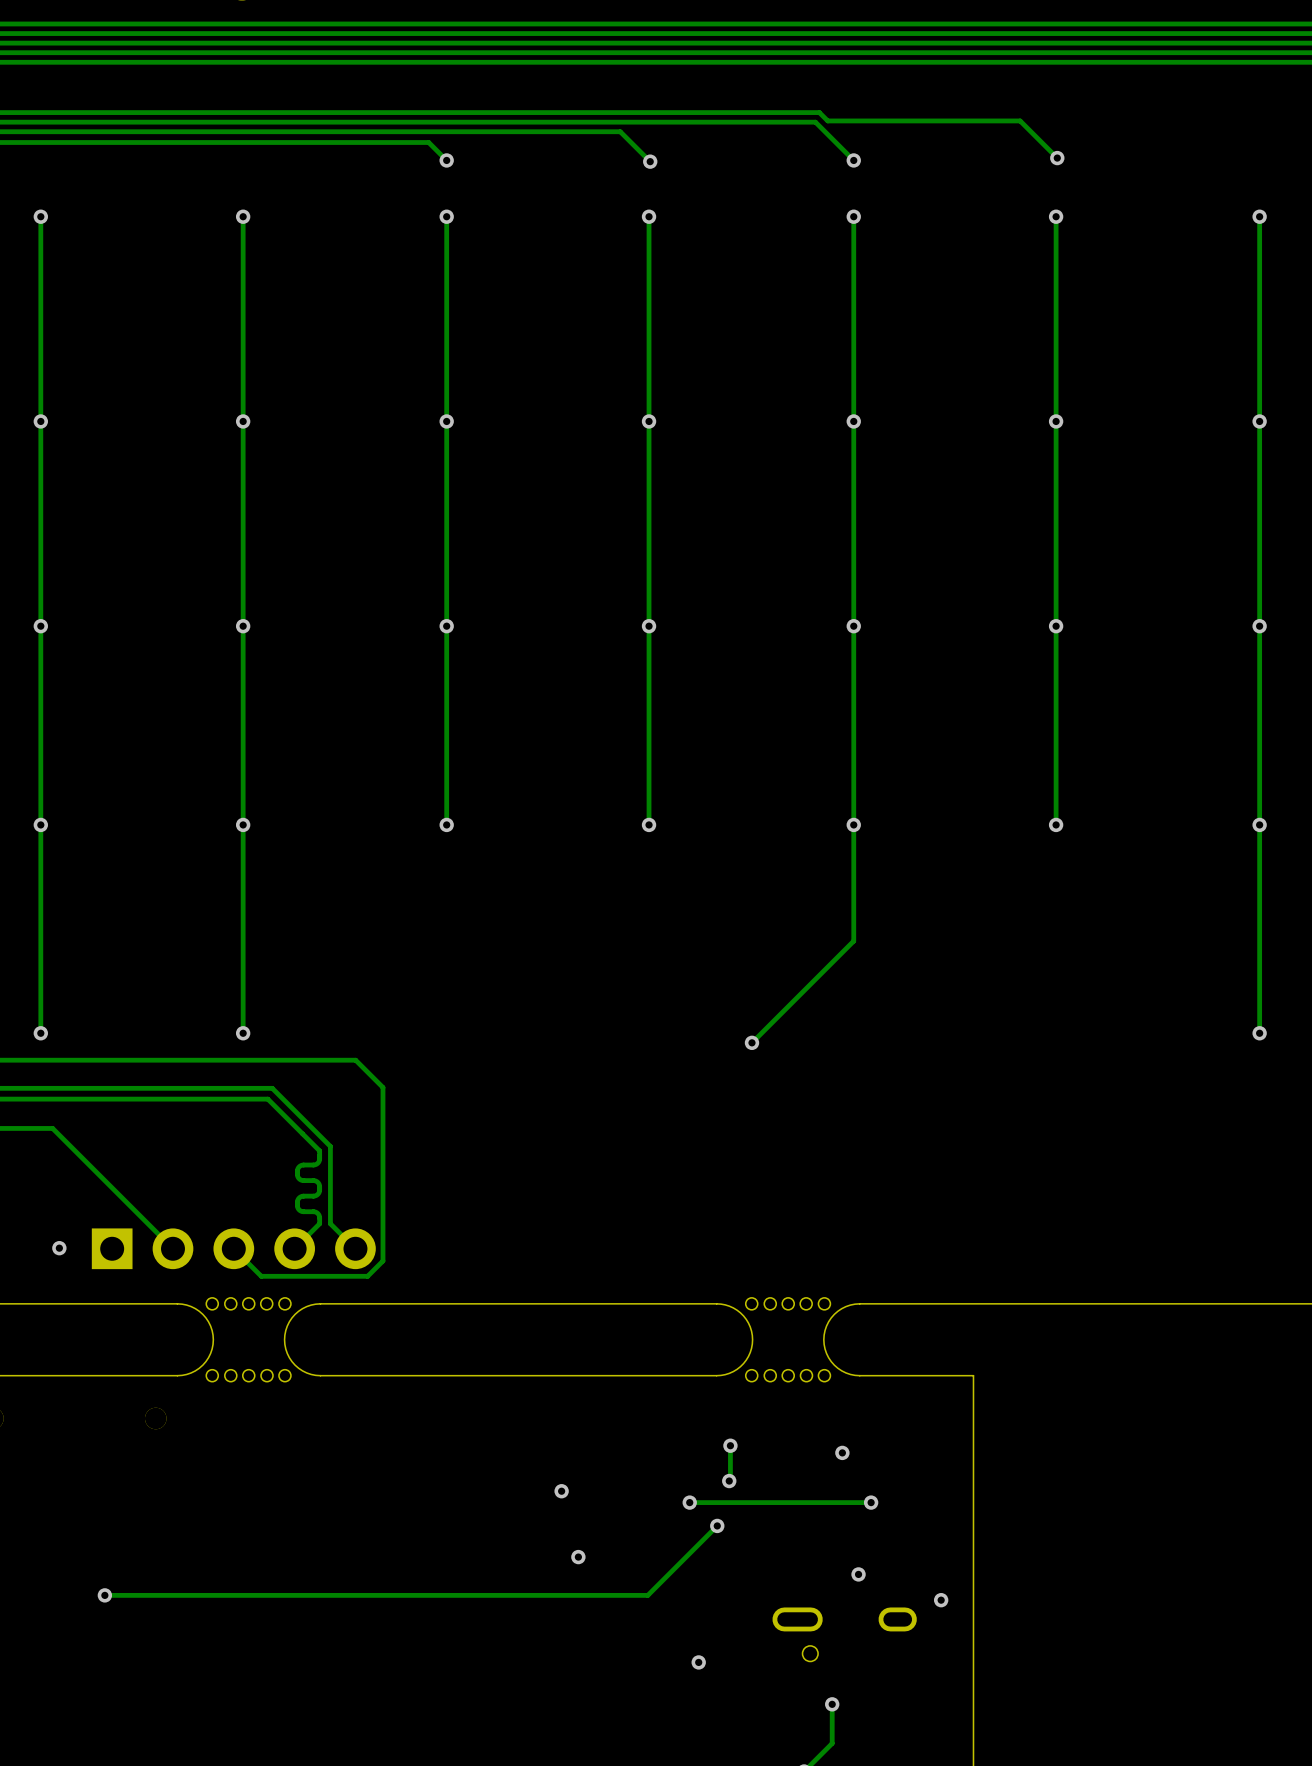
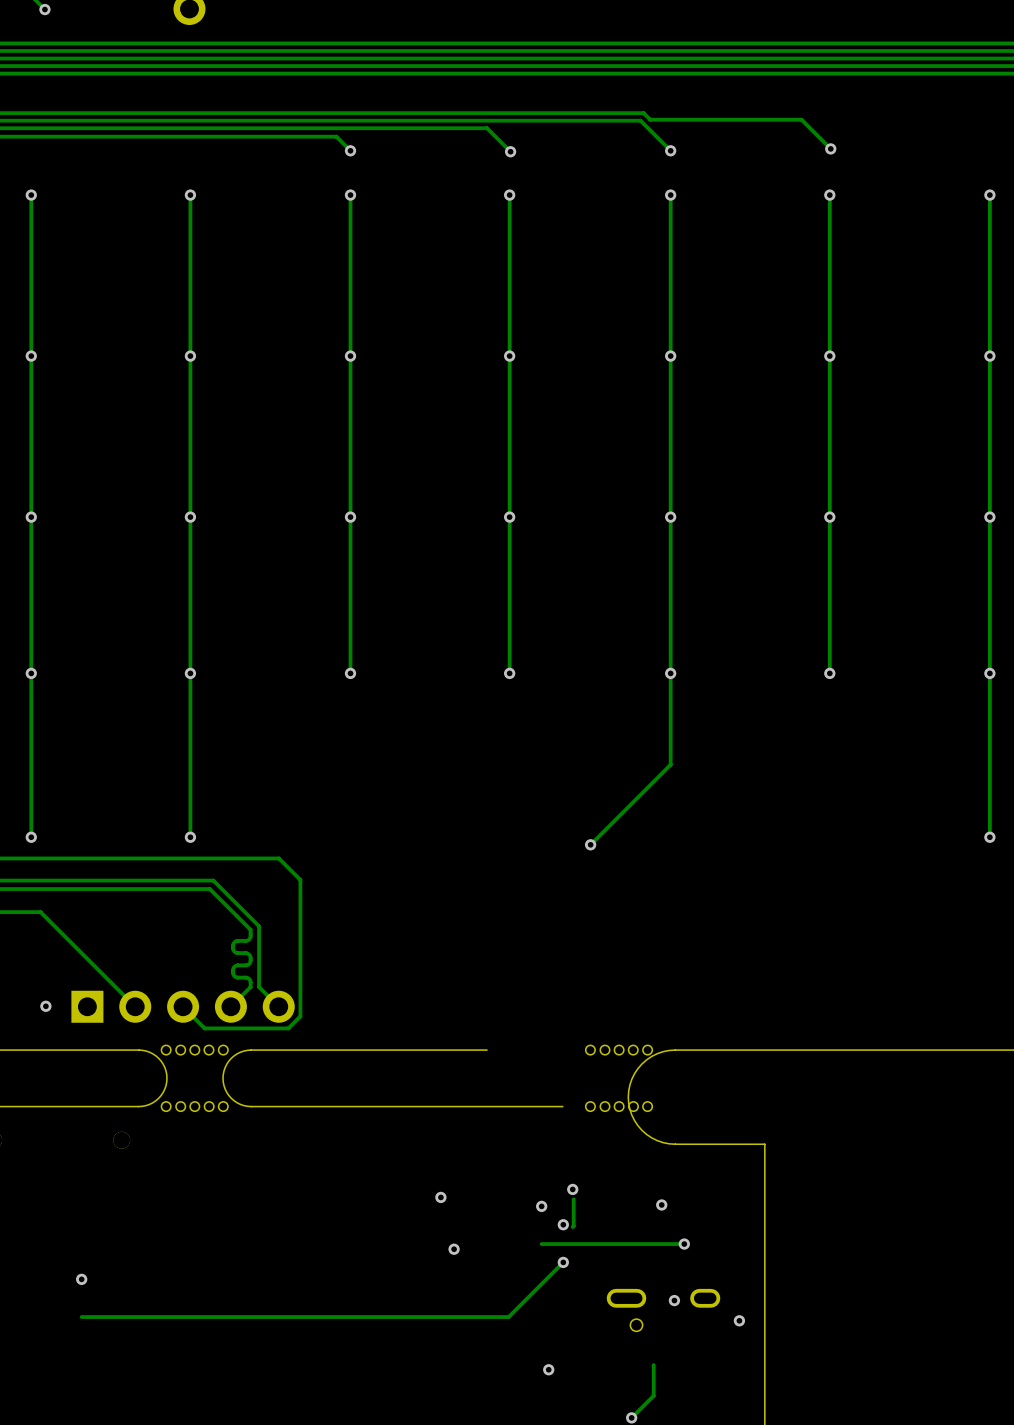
board edge: (620, 1303) (716, 1303) (729, 1306) (737, 1310) (746, 1319) (750, 1327) (752, 1339) (750, 1352) (746, 1360) (737, 1369) (729, 1373) (716, 1375) -> none
board edge: (859, 1303) (846, 1306) (837, 1311) (826, 1326) (824, 1344) (828, 1357) (834, 1365) (841, 1370) (855, 1375) (973, 1375) (973, 1423) -> (675, 1050) (663, 1051) (646, 1059) (638, 1068) (631, 1079) (628, 1091) (628, 1103) (634, 1120) (642, 1130) (651, 1137) (669, 1143) (764, 1144)
track: (730, 1445) (729, 1481) -> (573, 1199) (572, 1227)
via: (730, 1445) -> none
via: (842, 1452) -> none
via: none -> (661, 1204)
track: (871, 1502) (689, 1502) -> (684, 1244) (541, 1244)
via: (871, 1502) -> none
track: (717, 1525) (647, 1595) (104, 1595) -> (563, 1262) (508, 1317) (81, 1317)
via: none -> (684, 1244)
via: none -> (563, 1262)
via: (858, 1574) -> none
via: (941, 1600) -> none
via: none -> (674, 1300)
via: none -> (739, 1320)
via: (698, 1662) -> none
via: (832, 1704) -> none
via: none -> (548, 1369)

